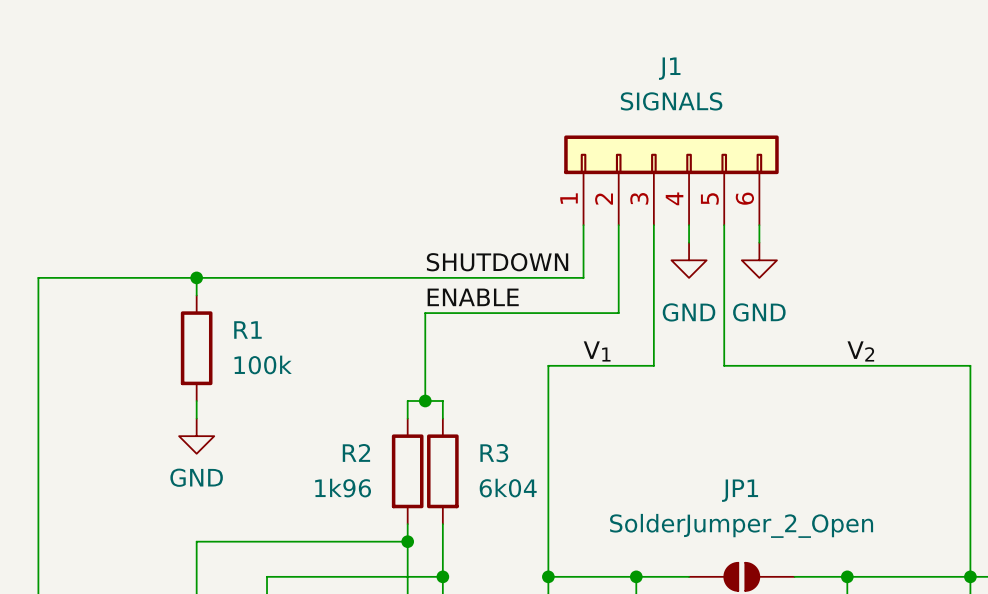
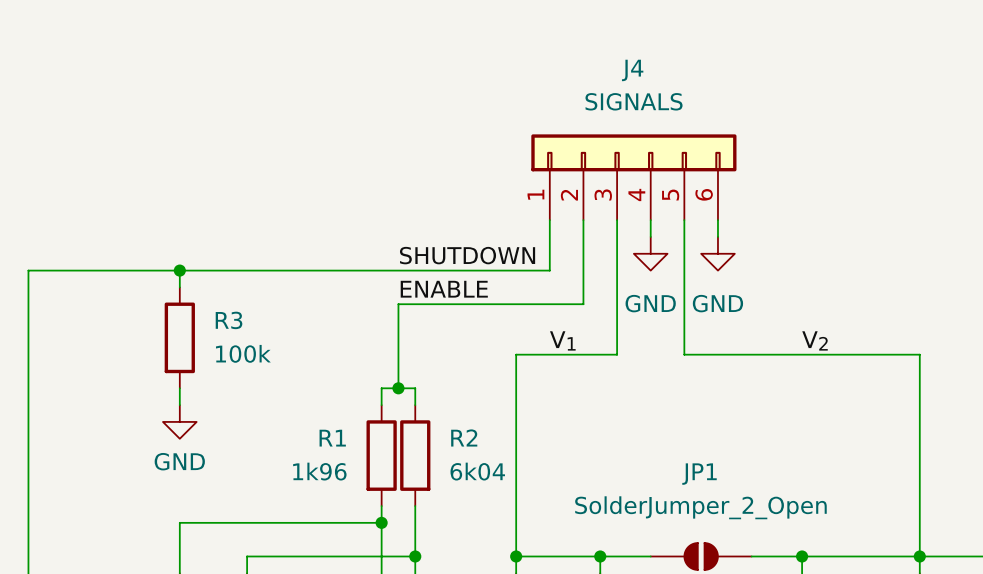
J1 name: J1 (669, 68) -> J4 (632, 70)
R1 name: R1 (247, 330) -> R3 (229, 320)
R2 name: R2 (356, 452) -> R1 (332, 438)
R3 name: R3 (494, 453) -> R2 (464, 437)

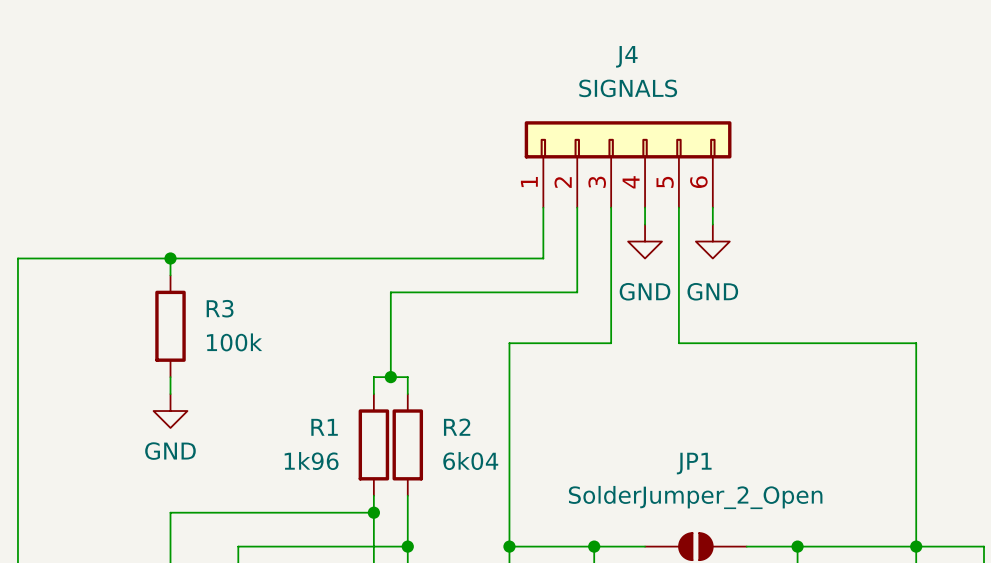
label: SHUTDOWN (467, 255) -> none
label: ENABLE (444, 289) -> none
label: V1 (562, 340) -> none
label: V2 (815, 340) -> none

